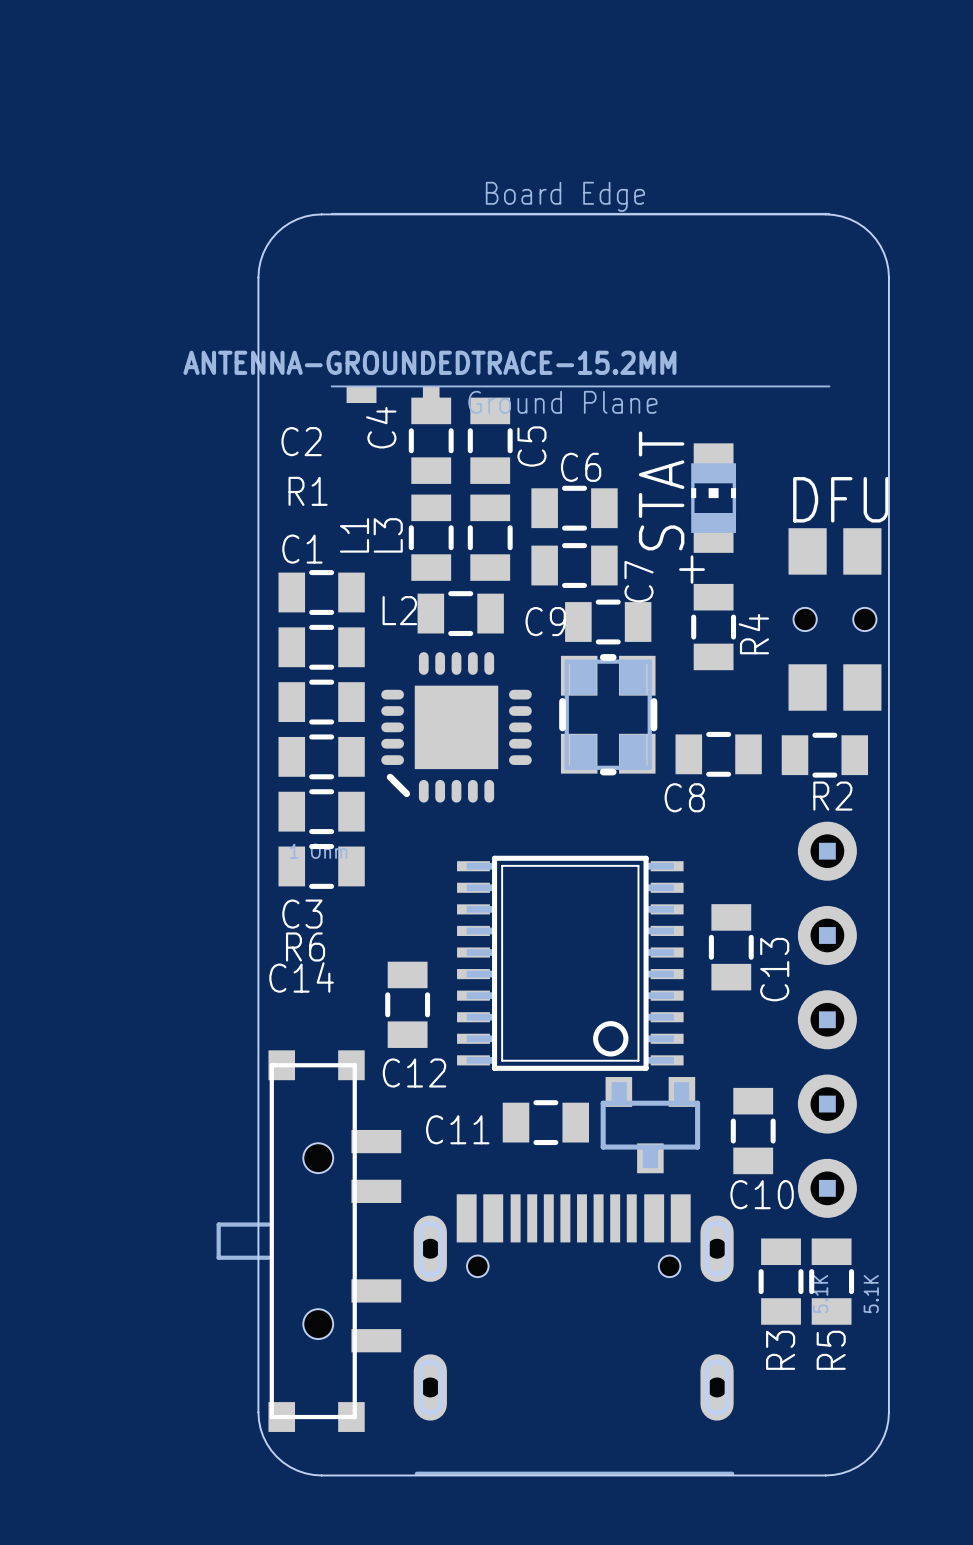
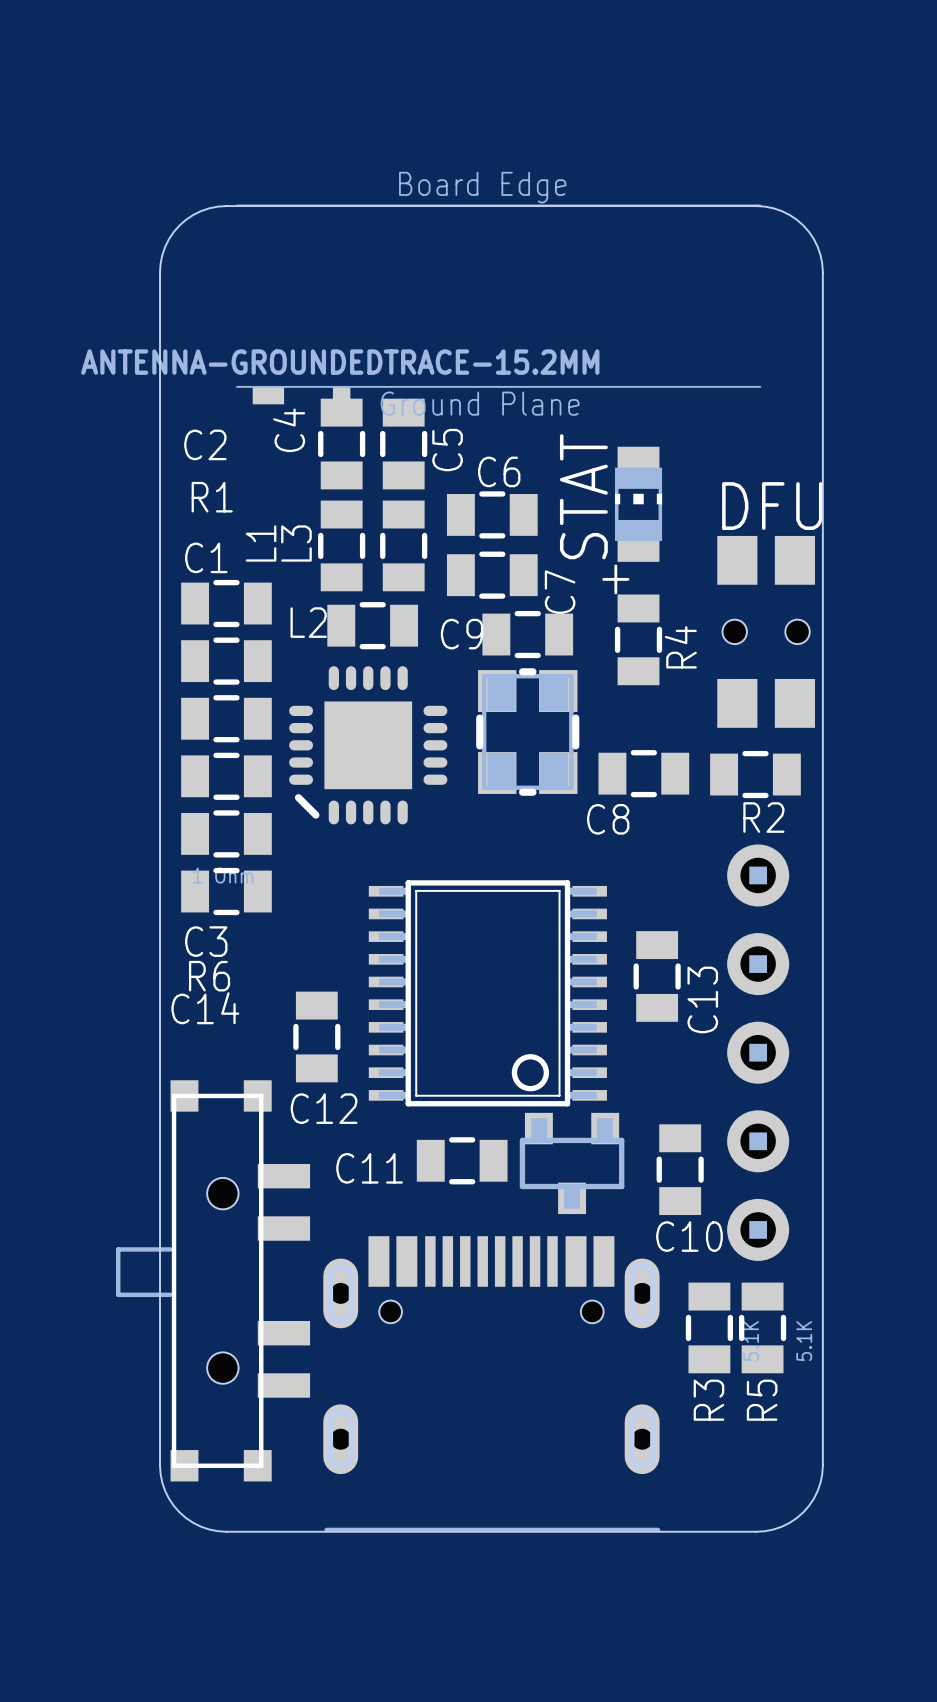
part footprint: [216, 1050, 402, 1432] -> [115, 1080, 311, 1482]

